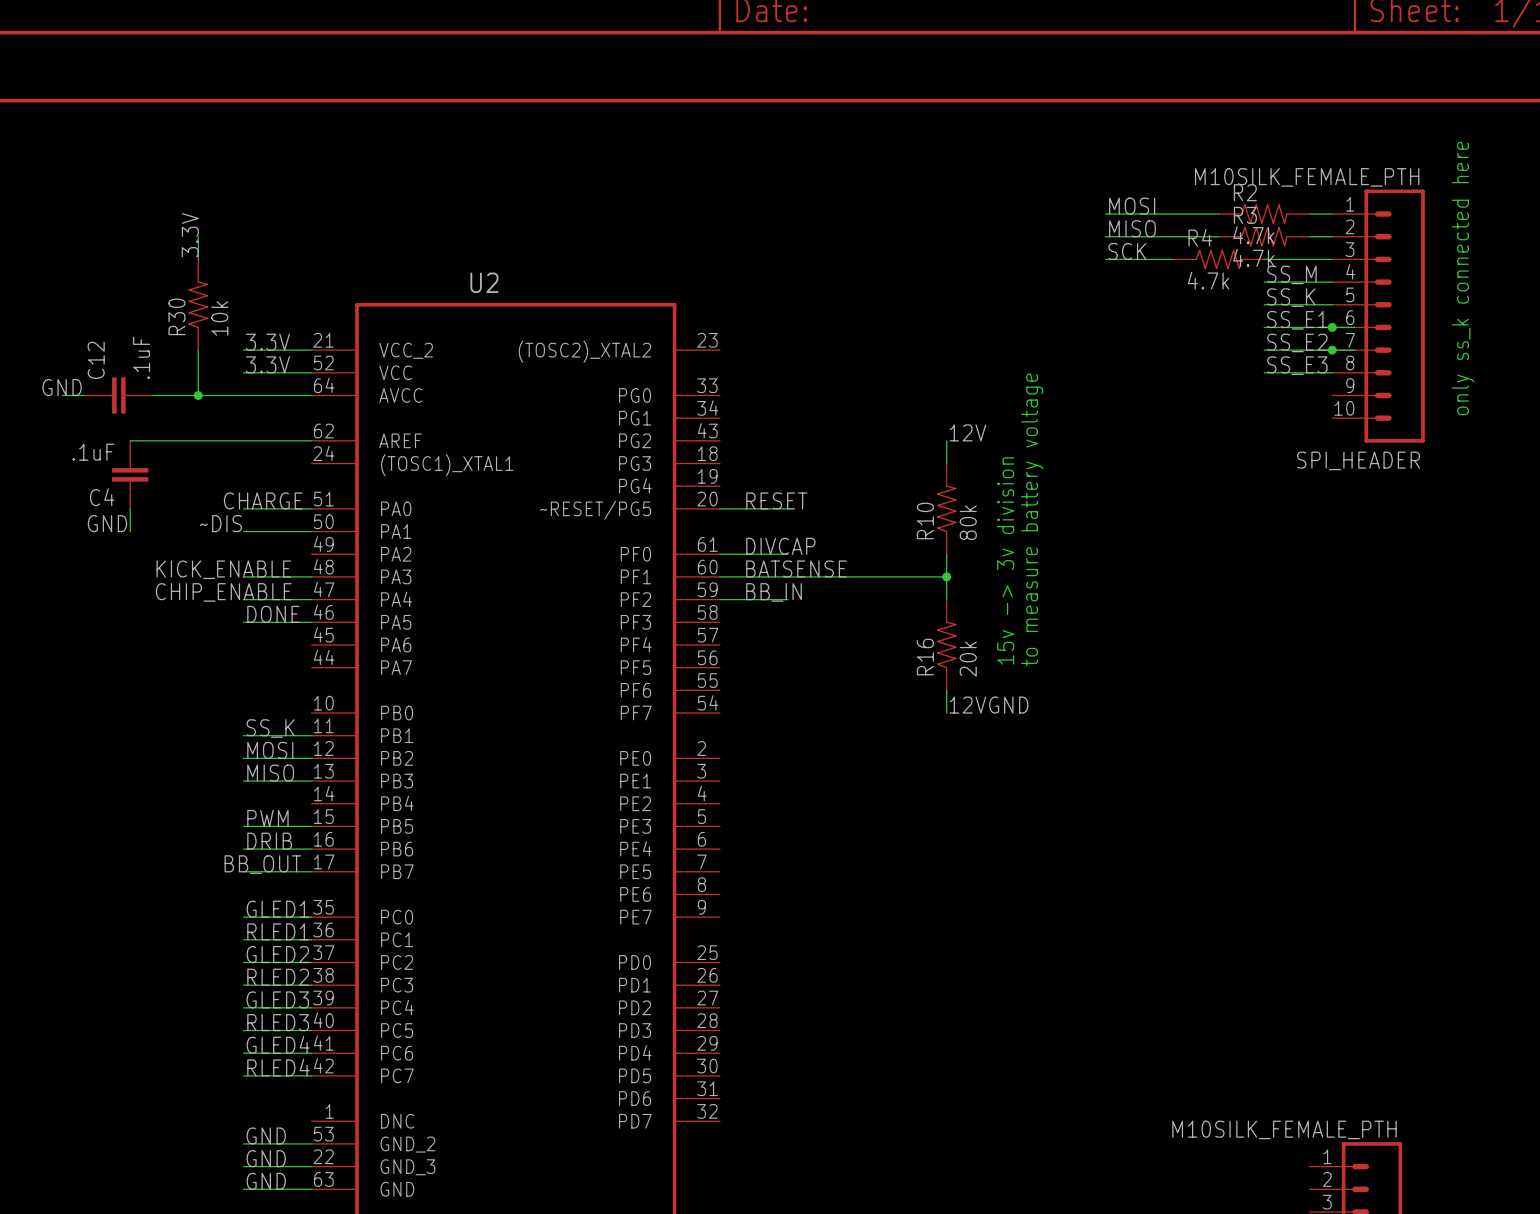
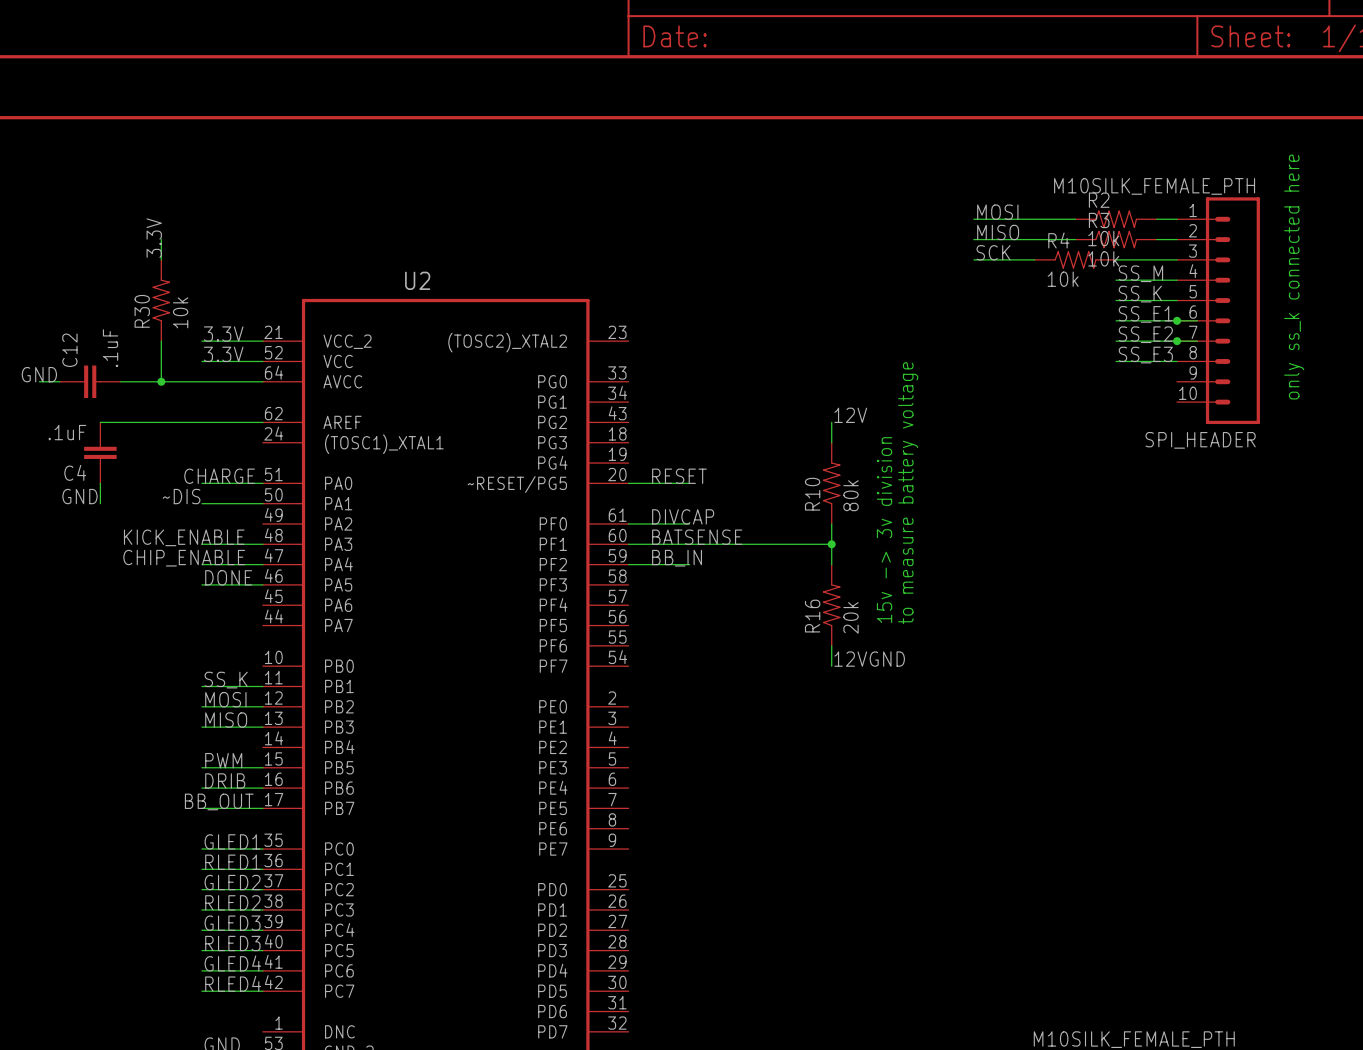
R2 value: 4.7k (1253, 235) -> 10k (1103, 238)
R3 value: 4.7k (1253, 257) -> 10k (1103, 258)
R4 value: 4.7k (1208, 280) -> 10k (1063, 279)

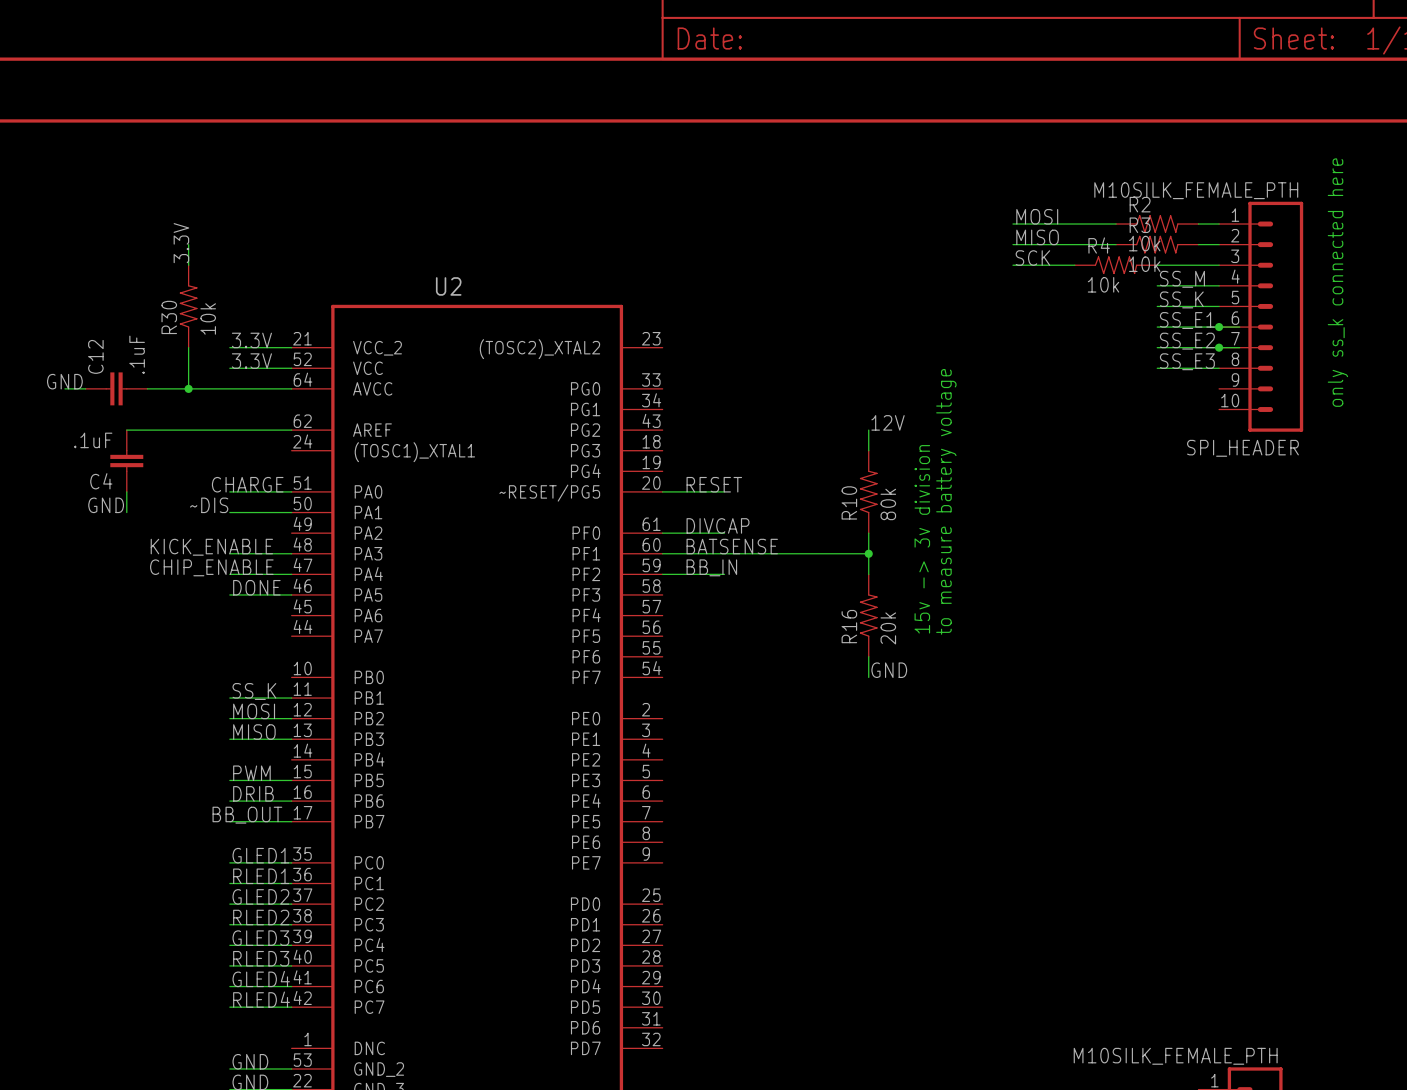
label: 12VGND (869, 659) -> GND (889, 670)

